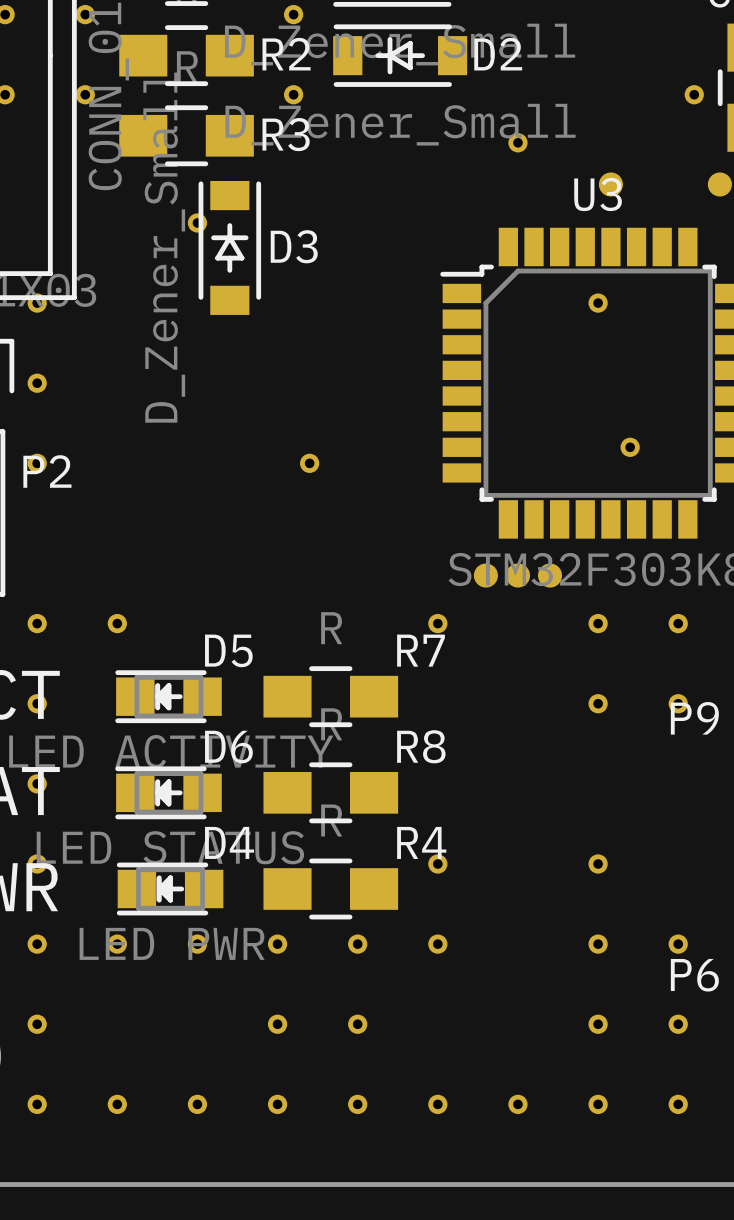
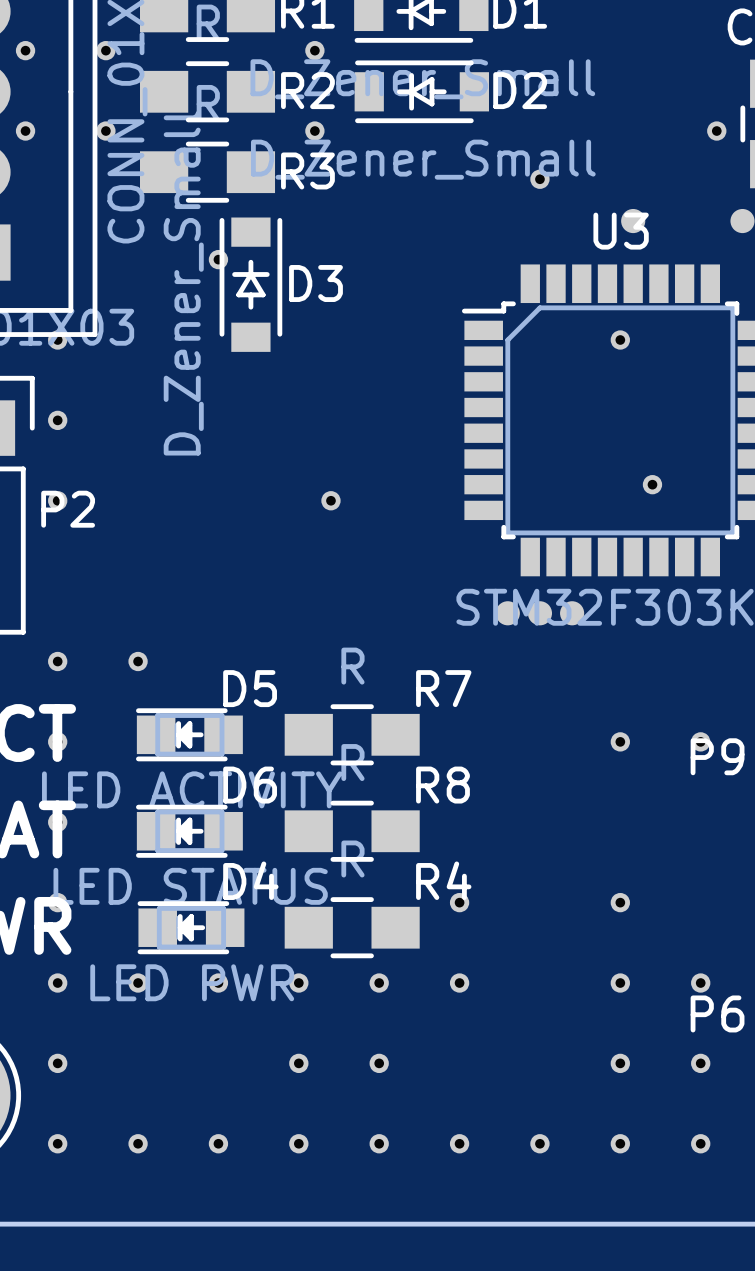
part: (437, 623) -> none
part: (598, 623) -> none
part: (678, 623) -> none

